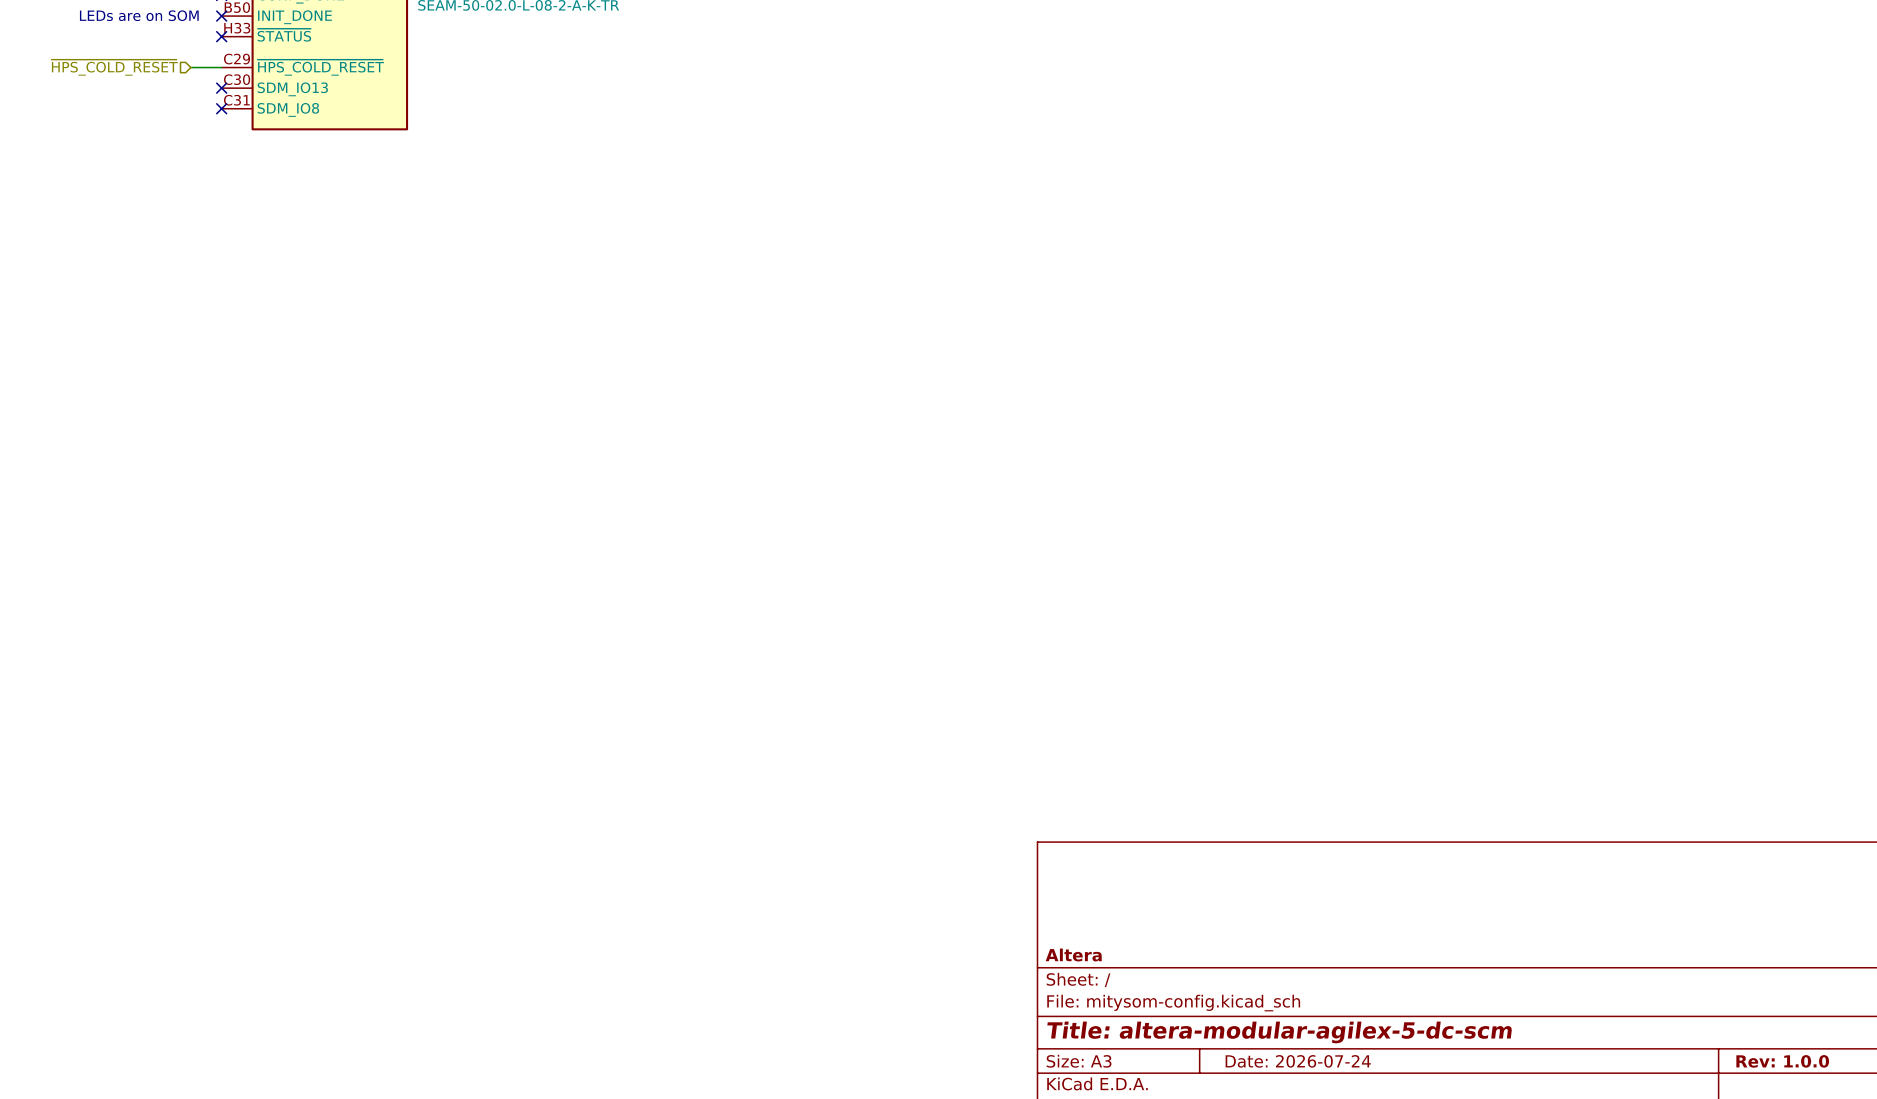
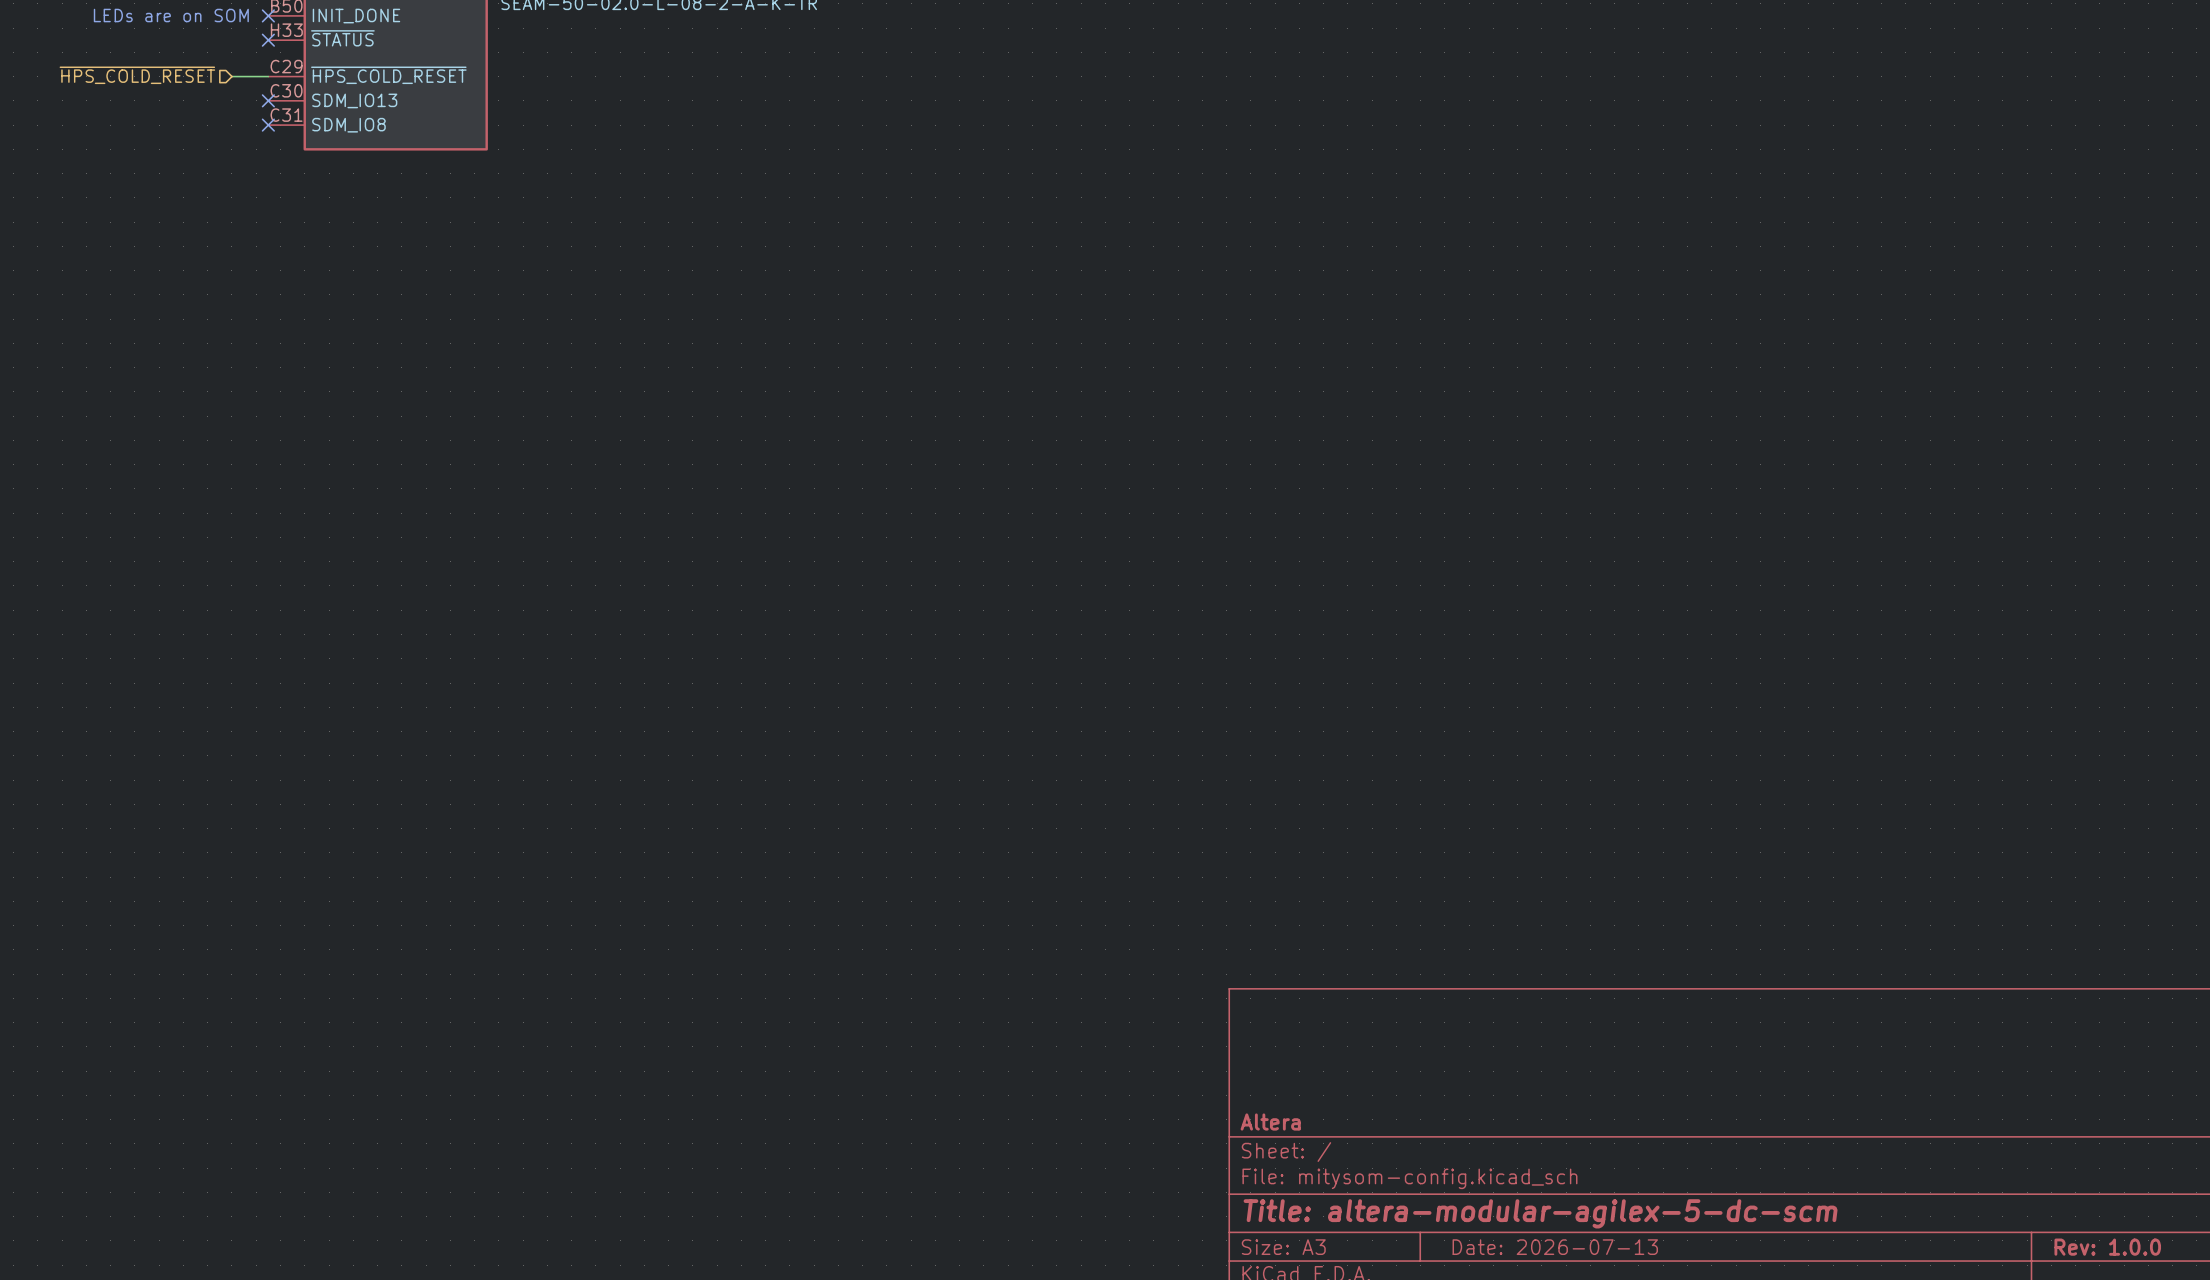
title block: Date: 2026-07-24 (1298, 1061) -> Date: 2026-07-13 (1555, 1247)

